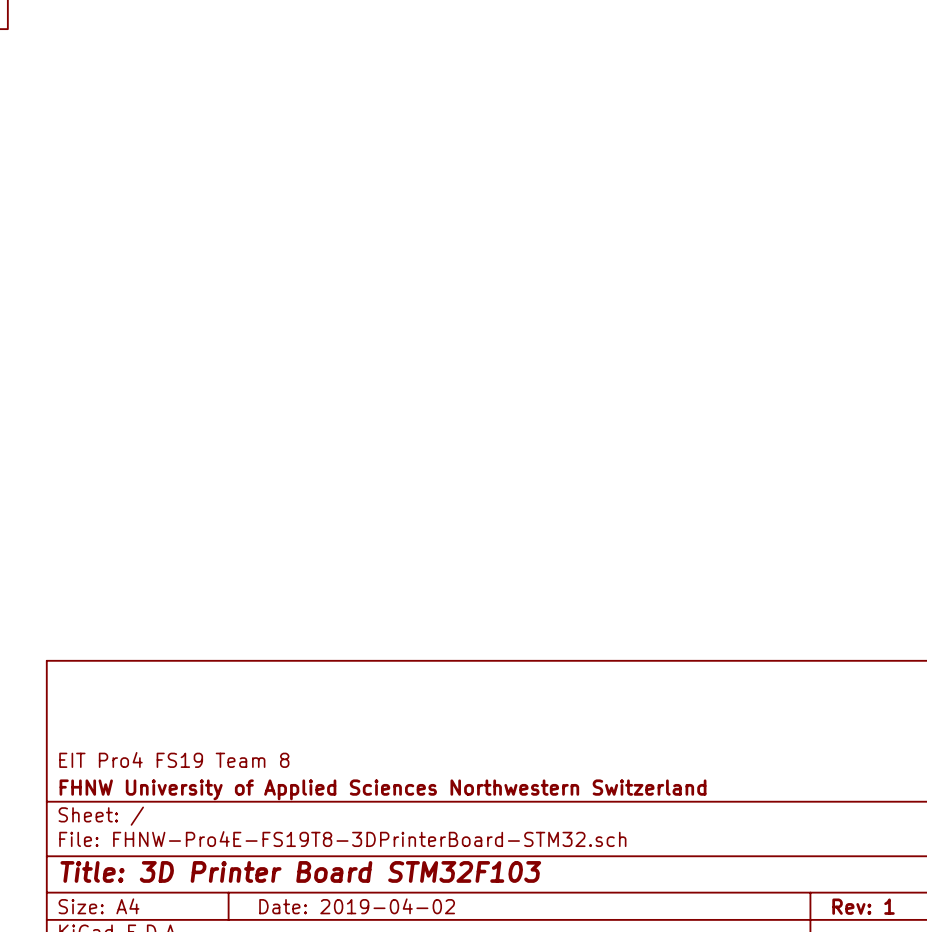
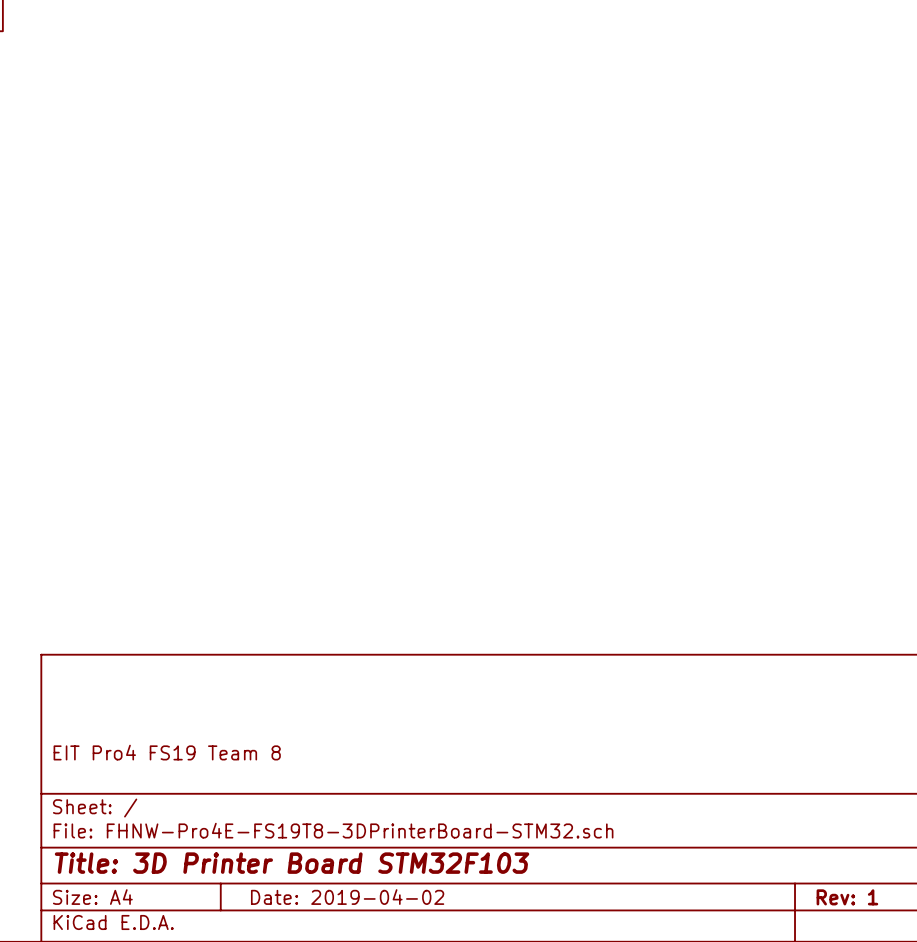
title block: FHNW University of Applied Sciences Northwestern Switzerland (383, 789) -> none

